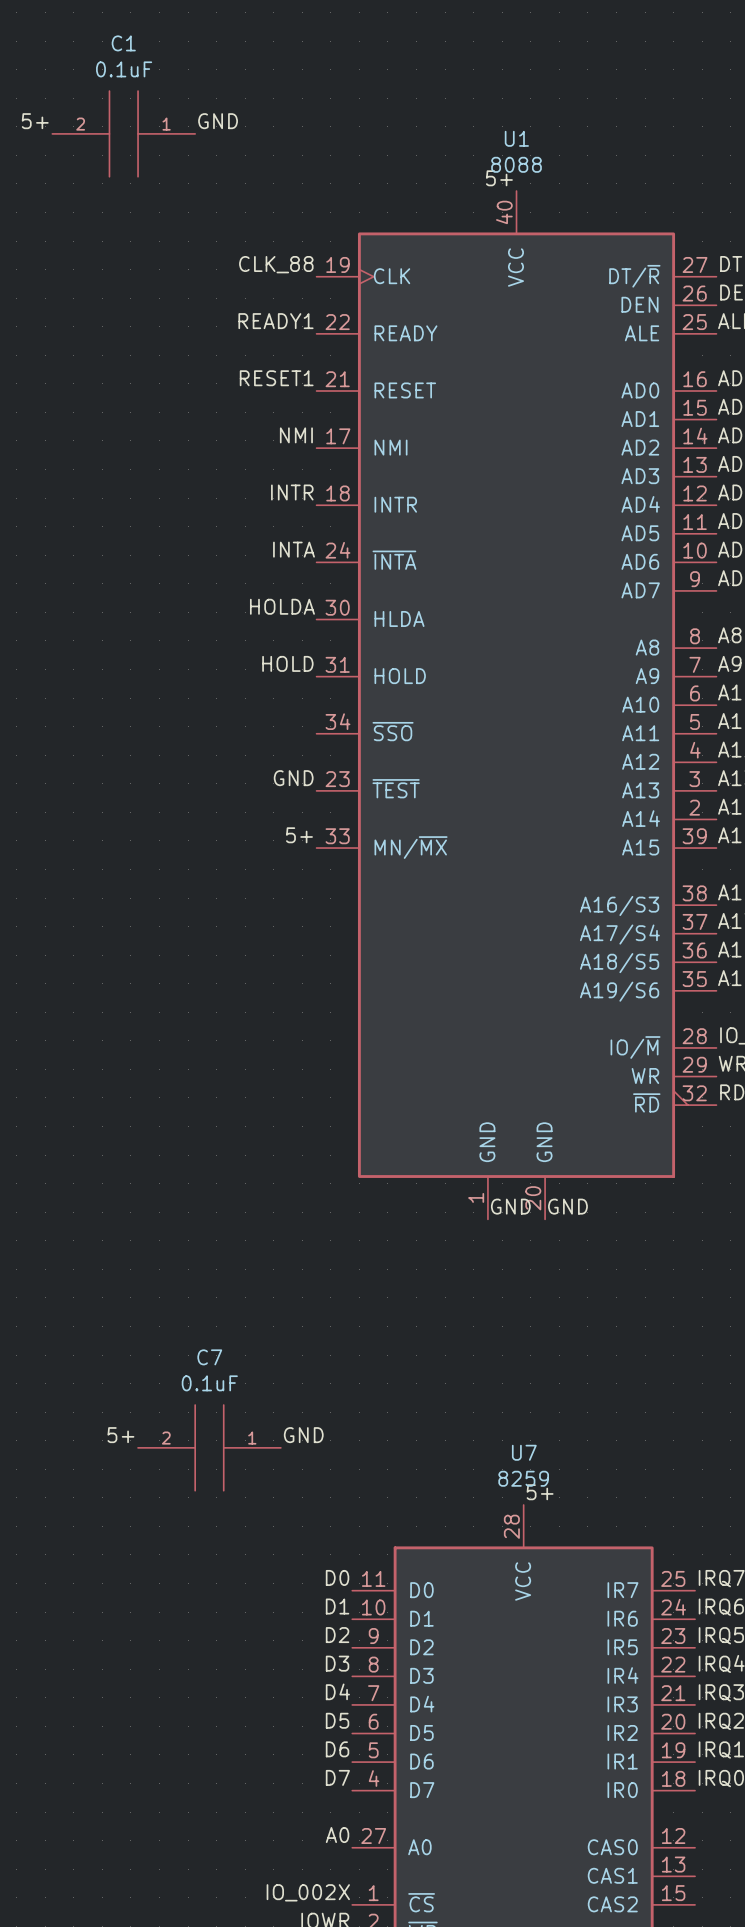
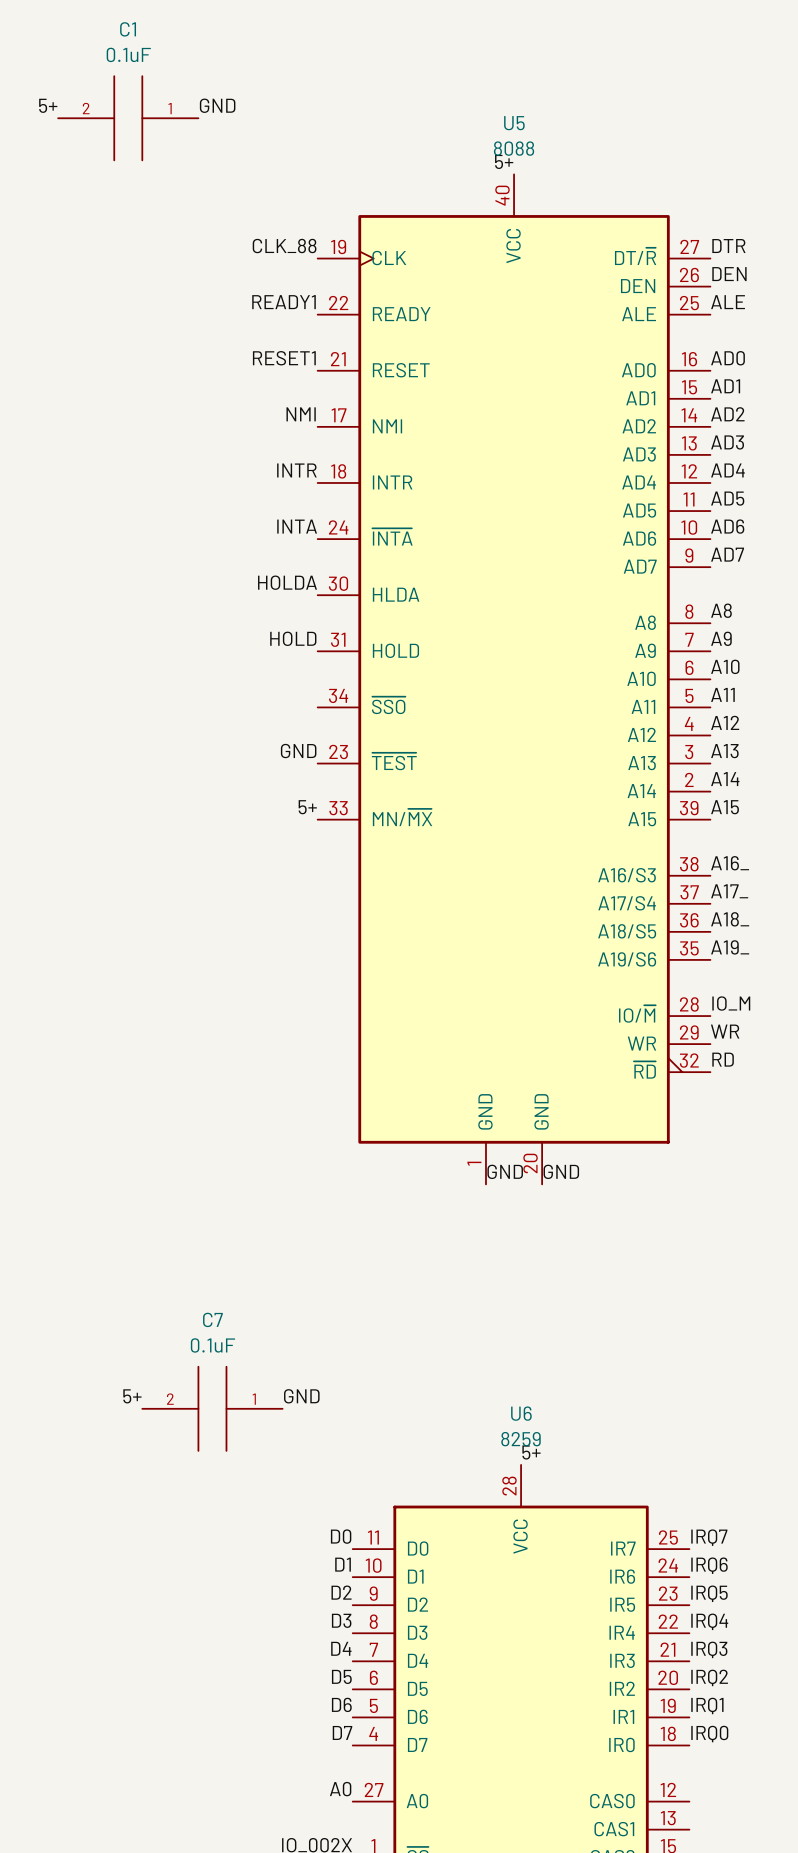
U1 name: U1 (516, 138) -> U5 (514, 123)
U7 name: U7 (524, 1452) -> U6 (521, 1413)

